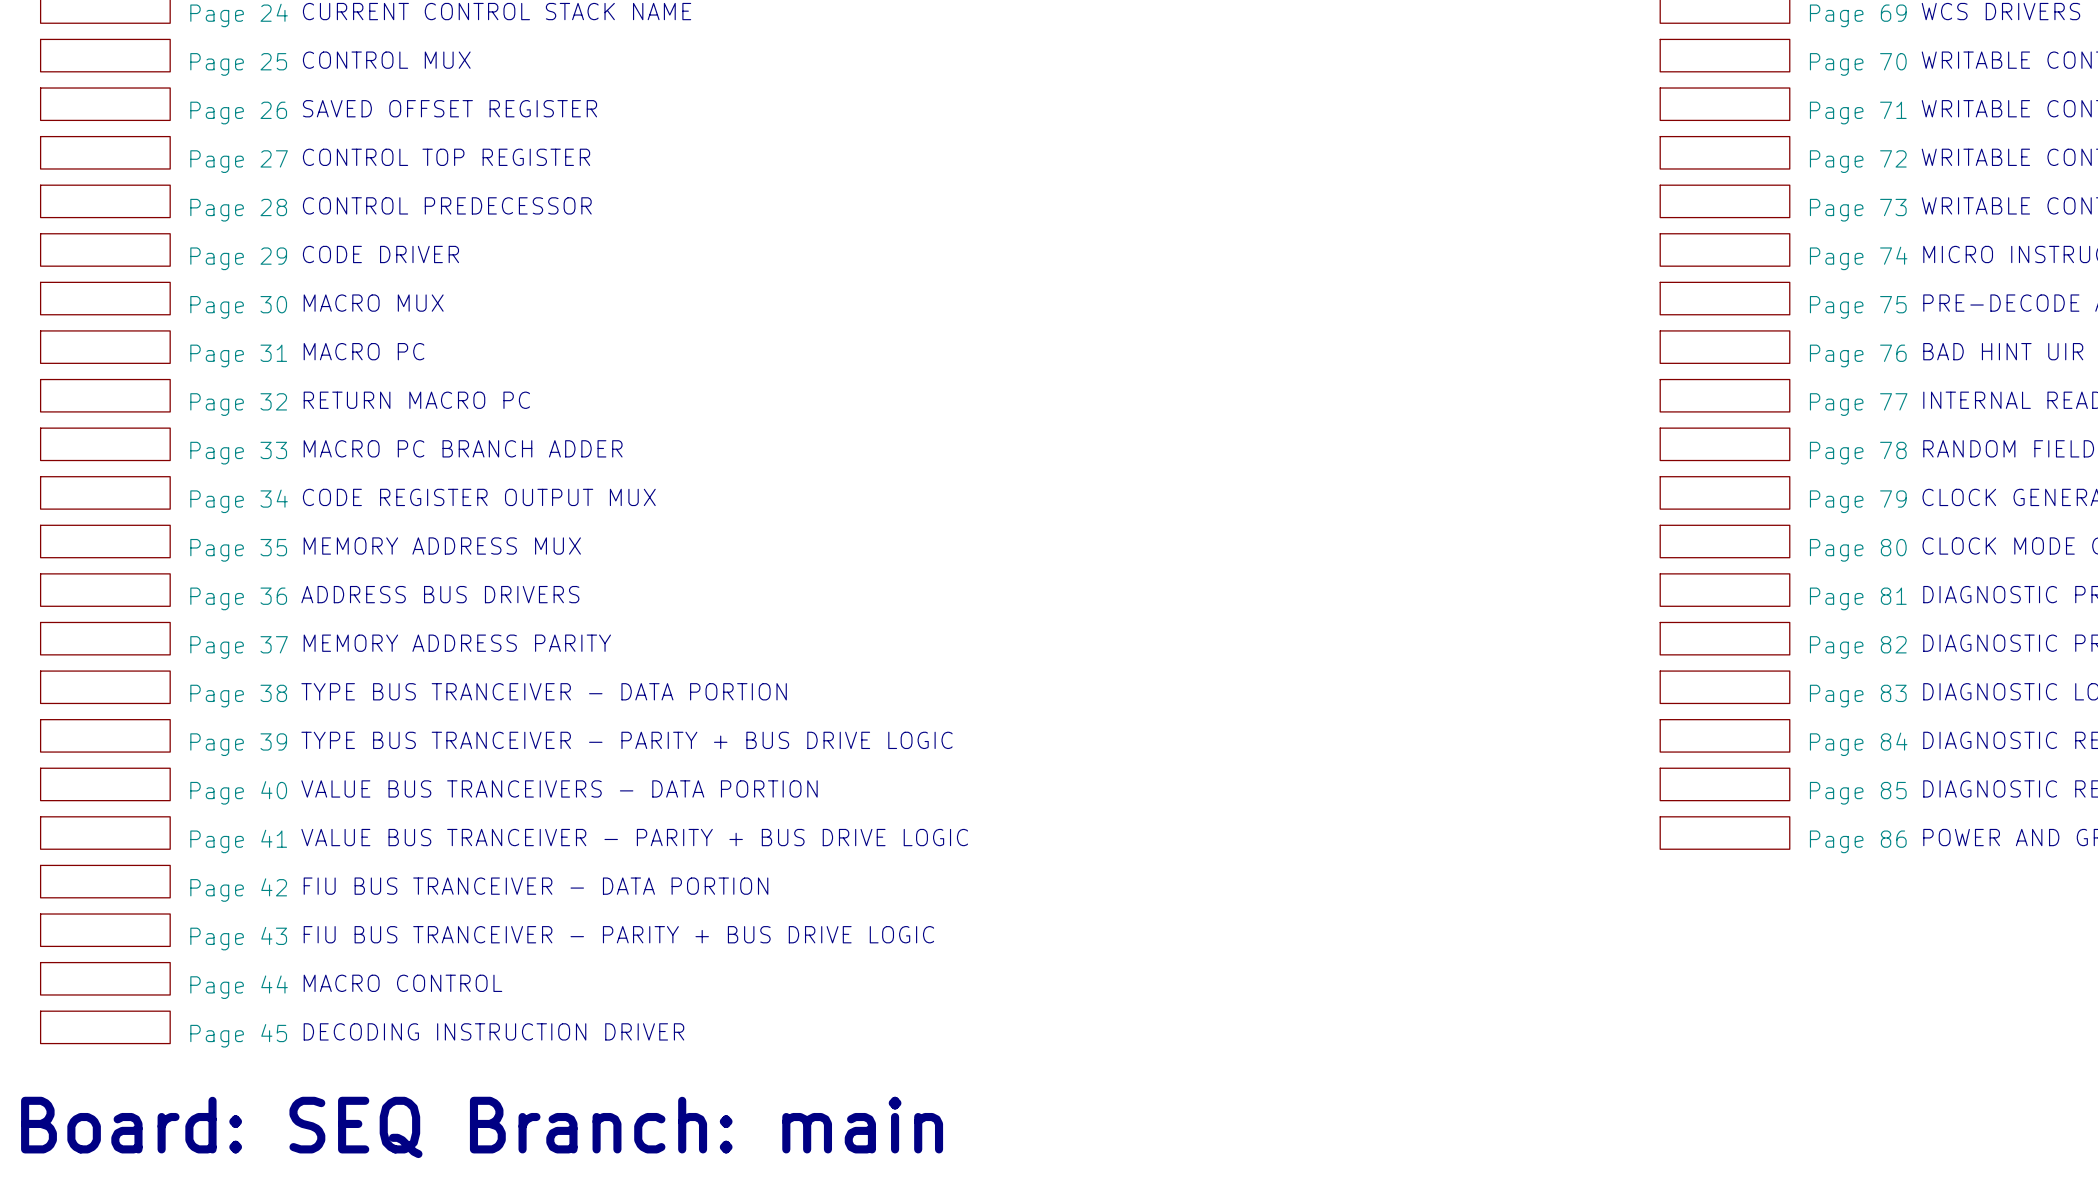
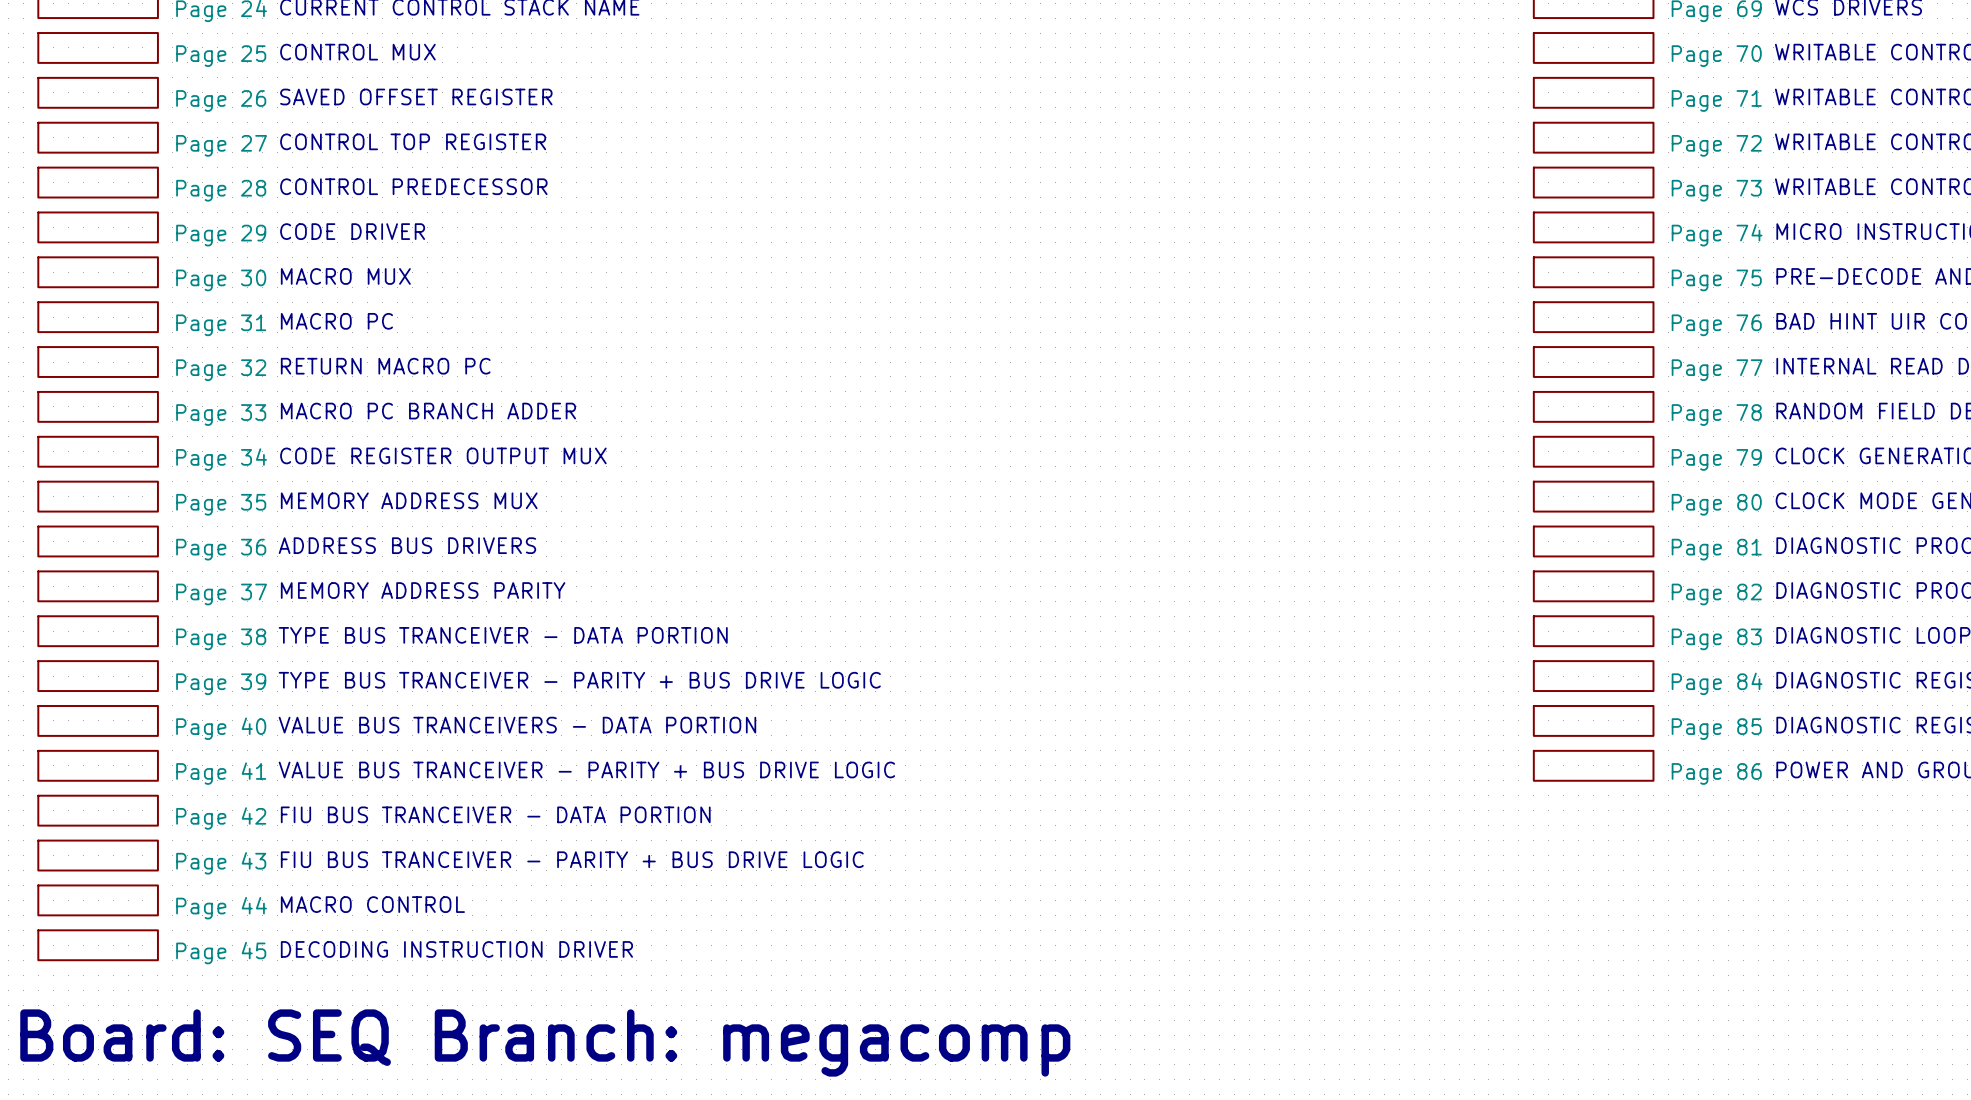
text: Board: SEQ Branch: main (482, 1127) -> Board: SEQ Branch: megacomp (545, 1042)

